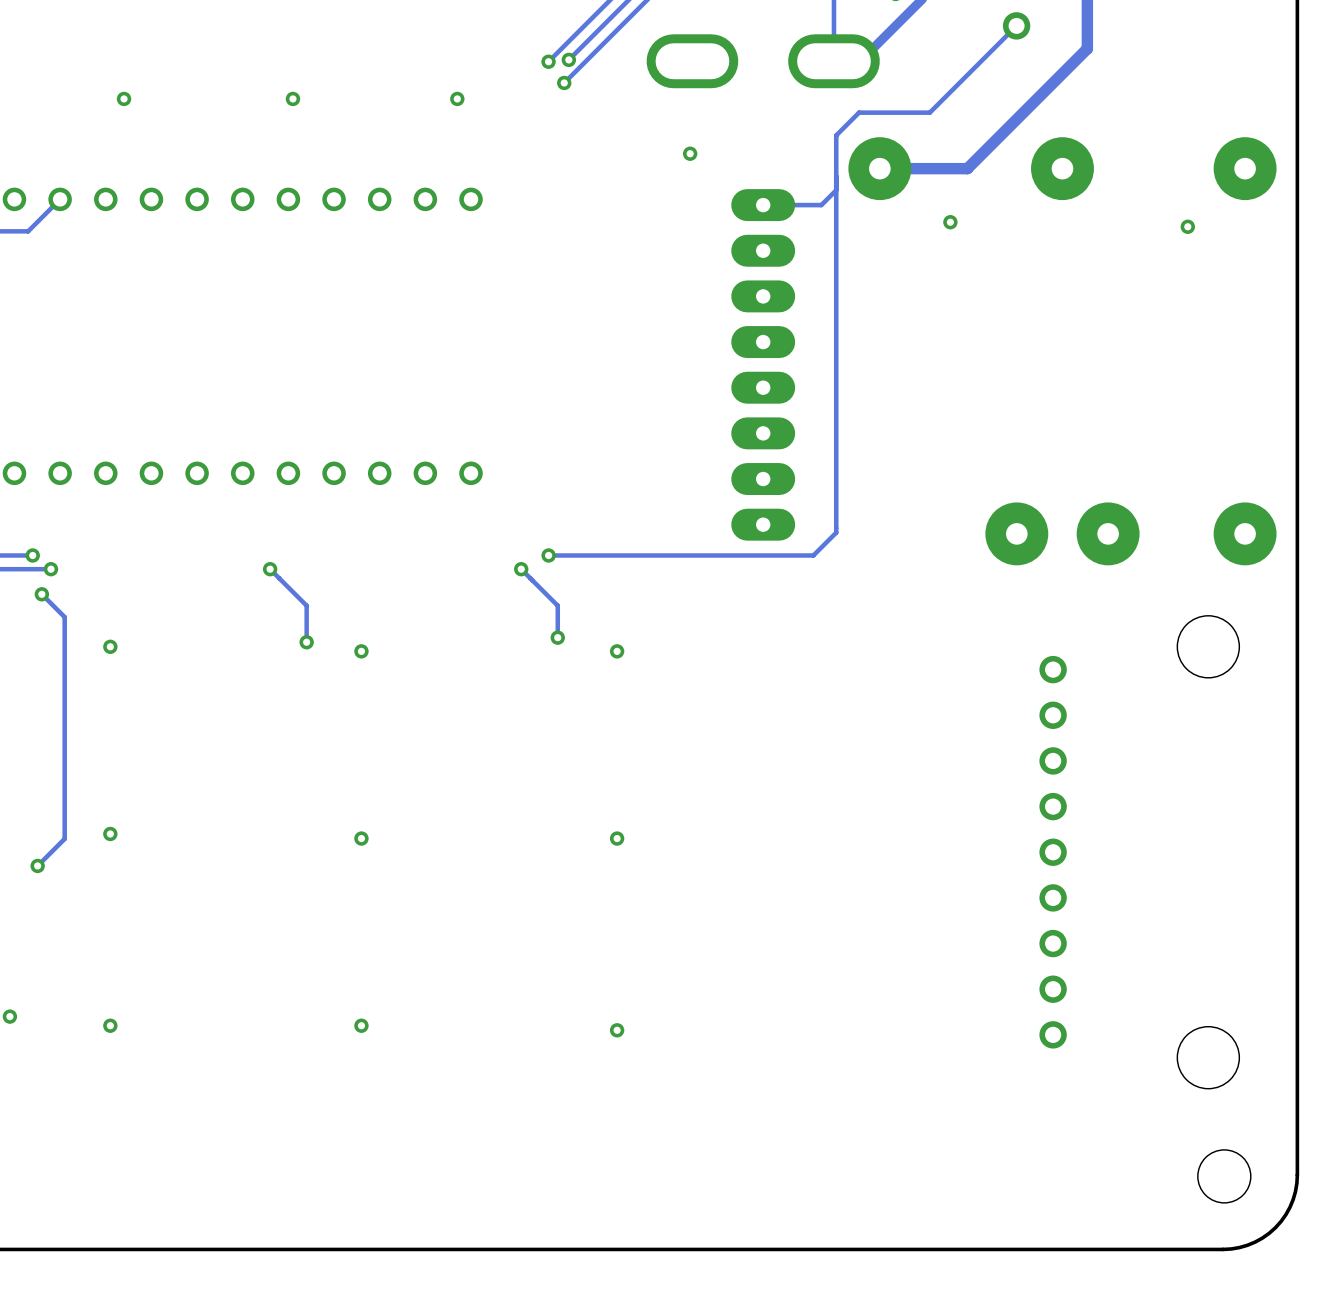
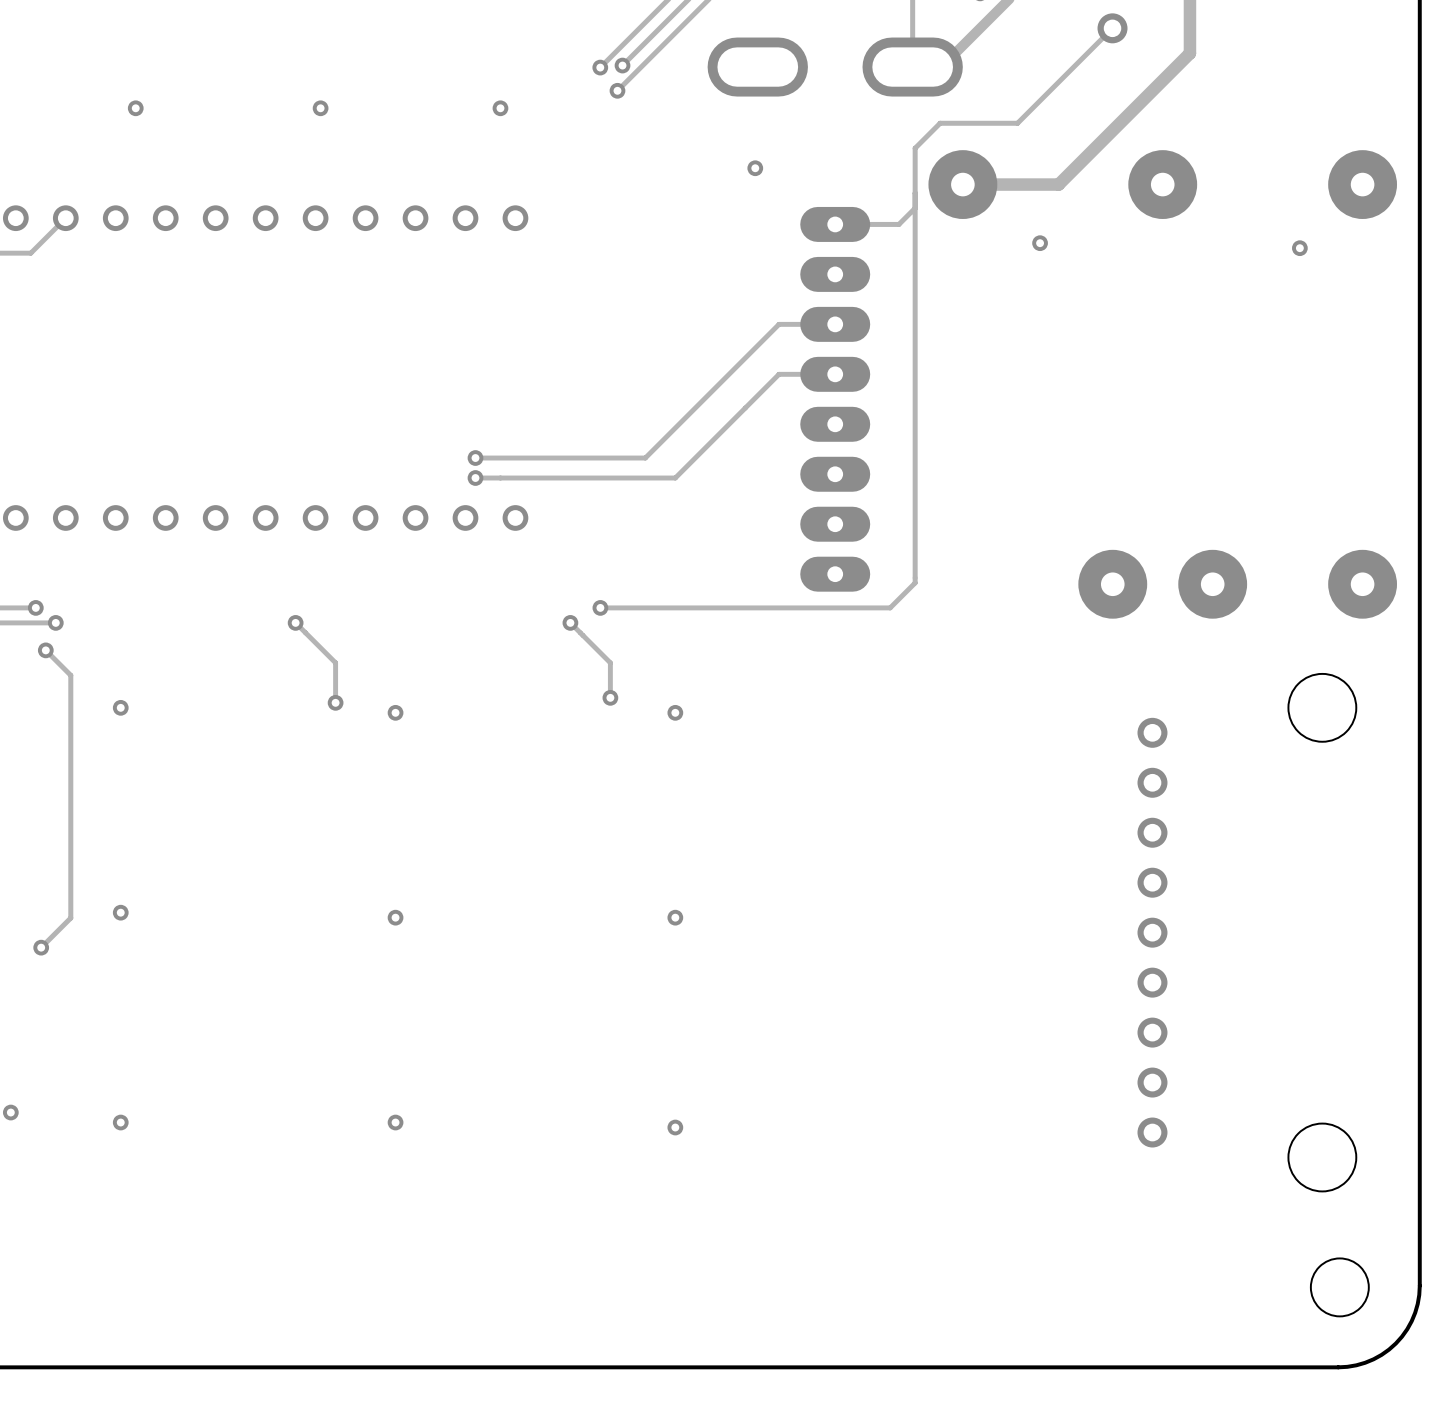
track: none -> (835, 324) (779, 324) (645, 458) (475, 458)
track: none -> (835, 374) (779, 374) (675, 478) (475, 478)
via: none -> (475, 458)
via: none -> (475, 478)

